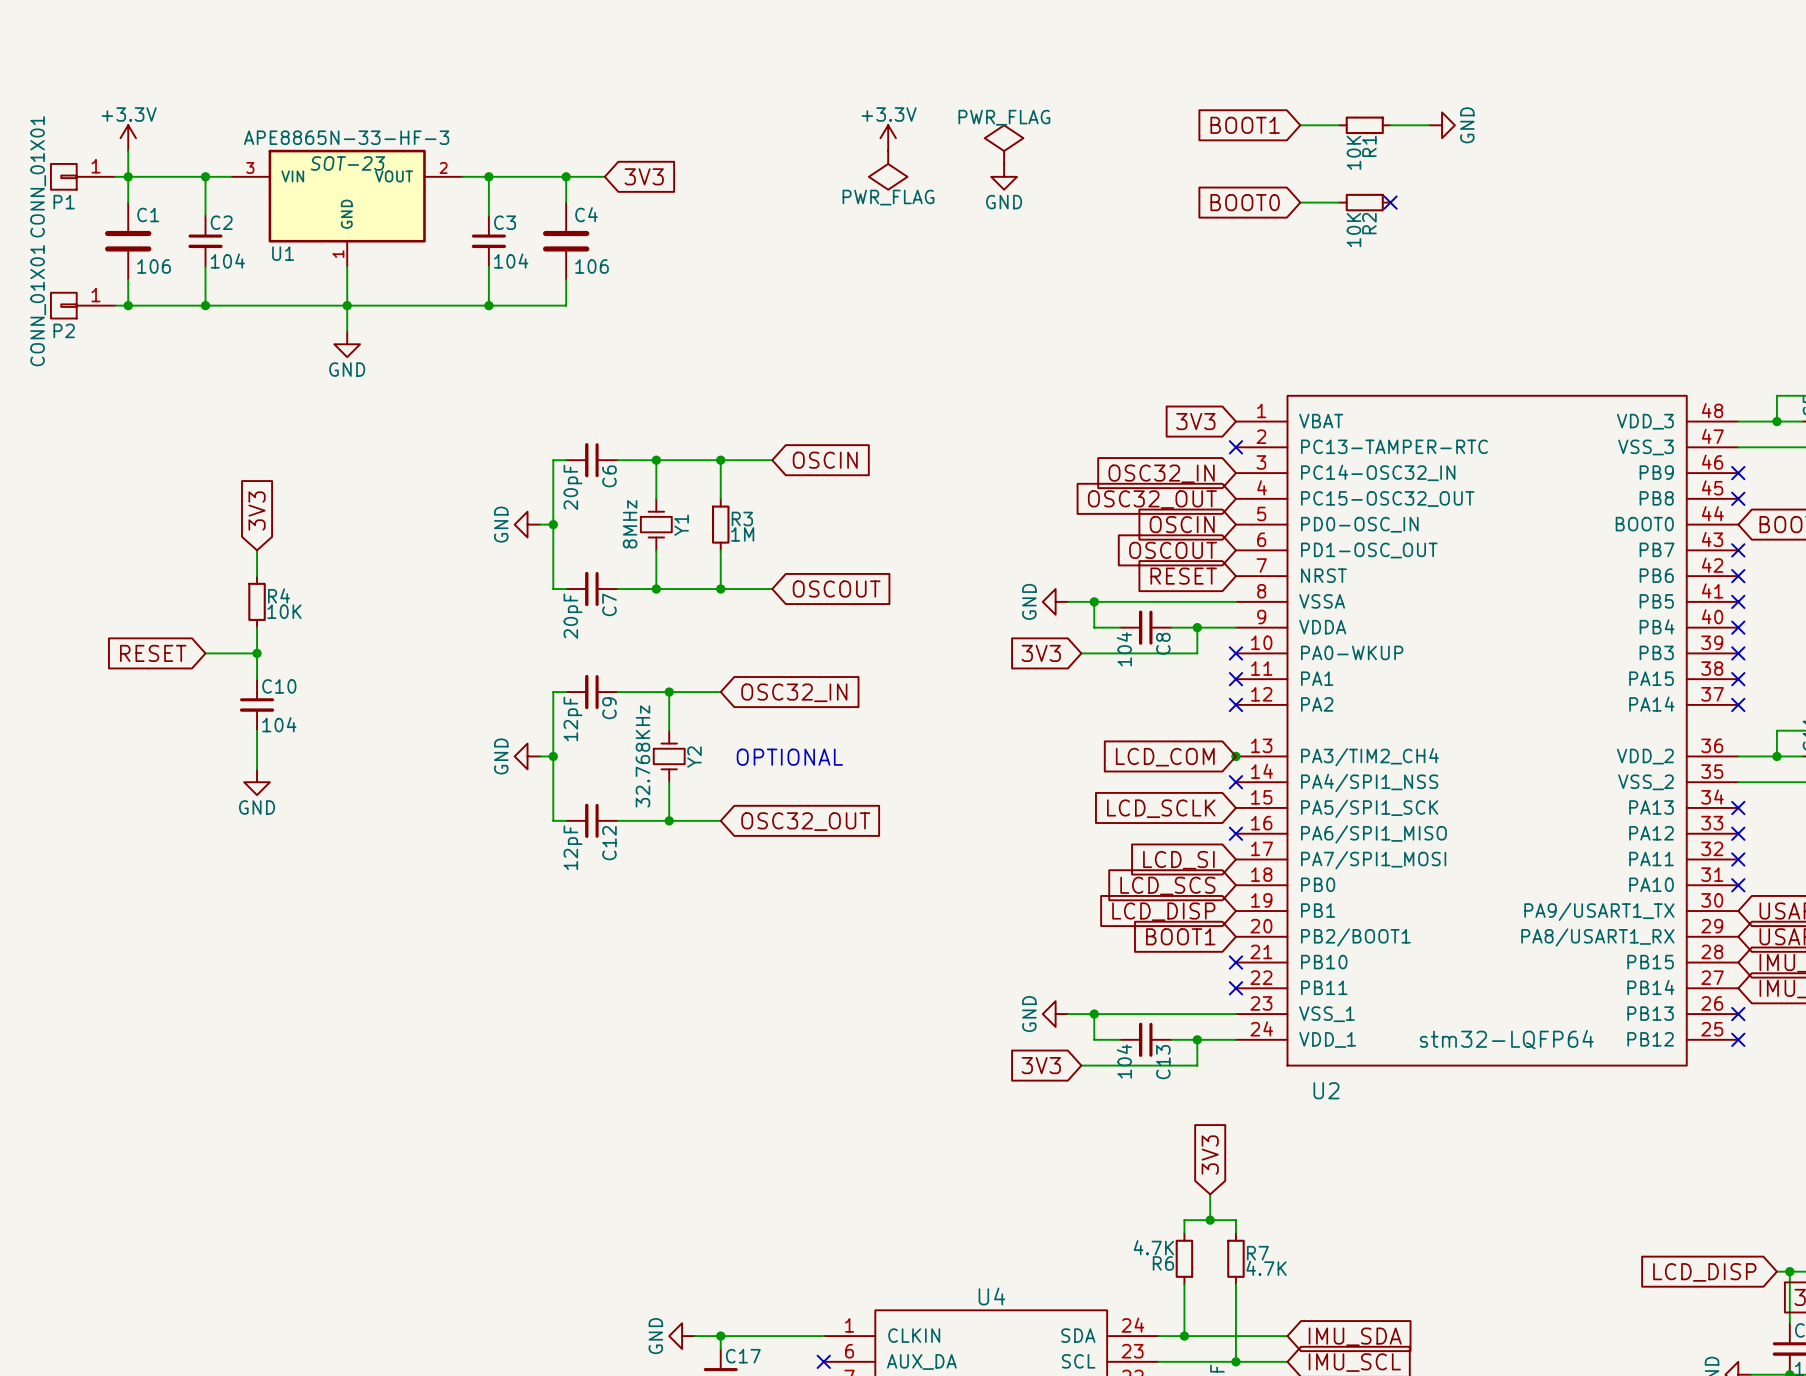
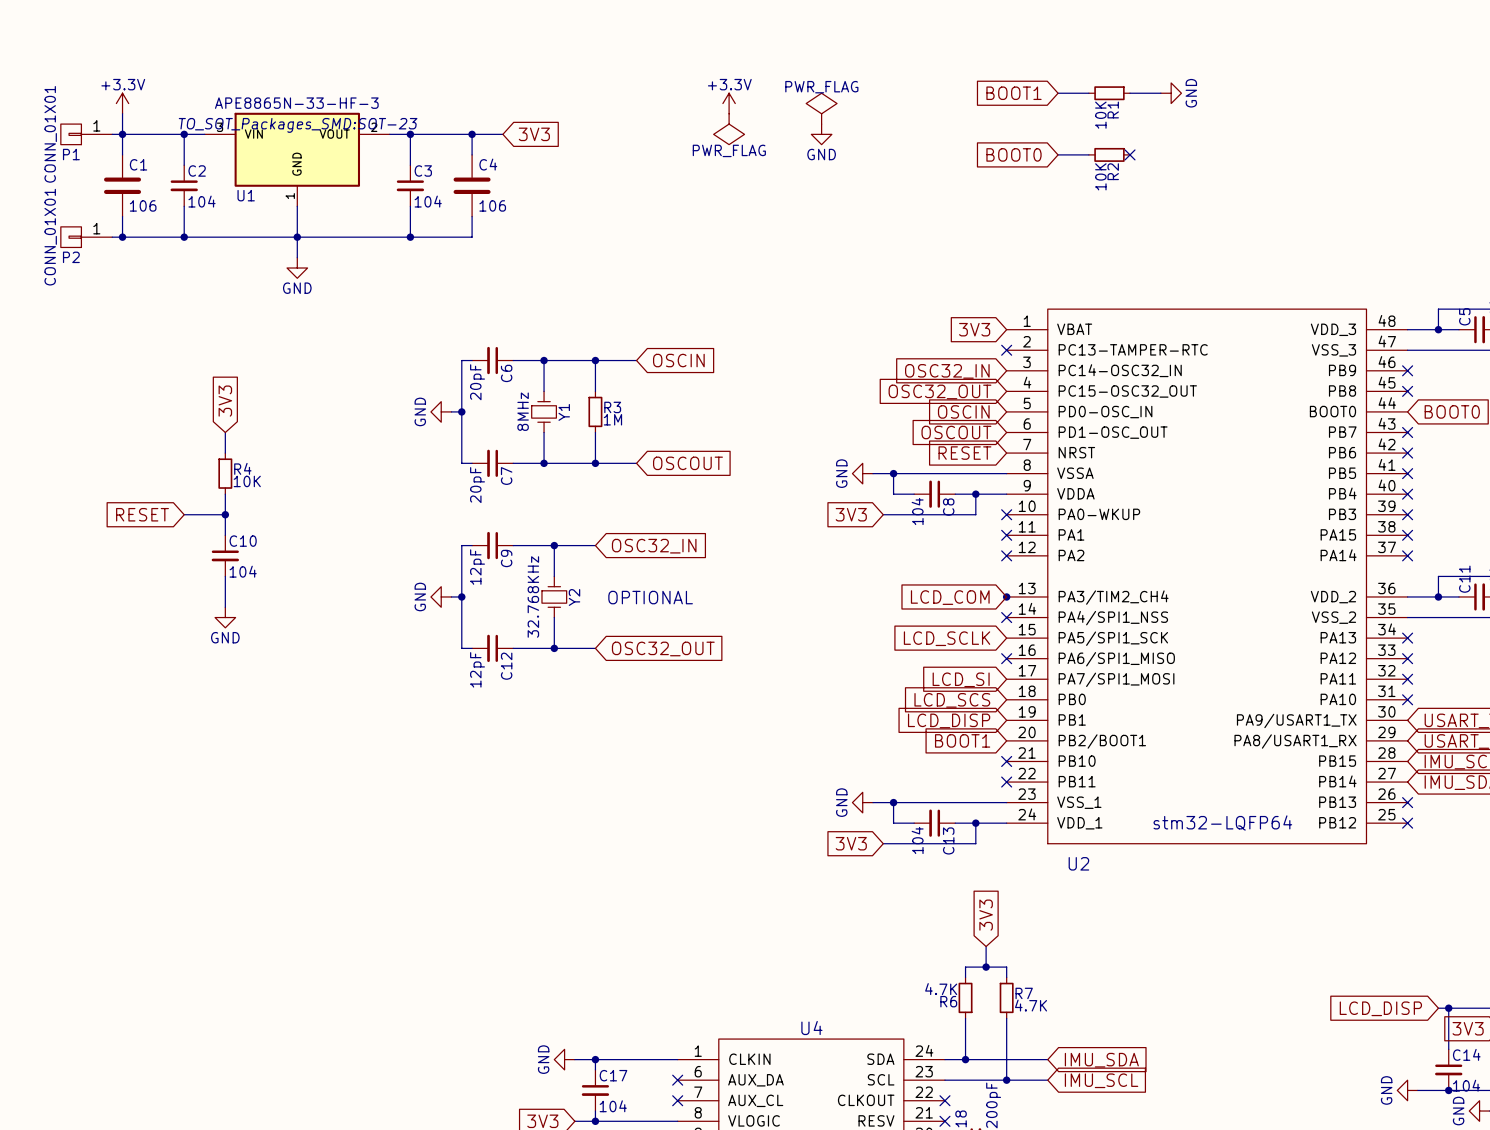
U1 text: SOT-23 (348, 163) -> TO_SOT_Packages_SMD:SOT-23 (298, 125)

